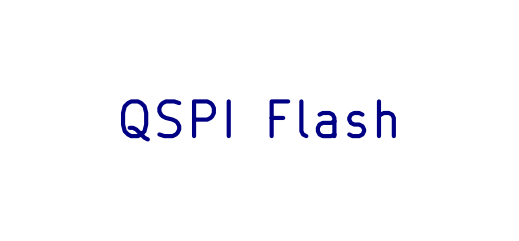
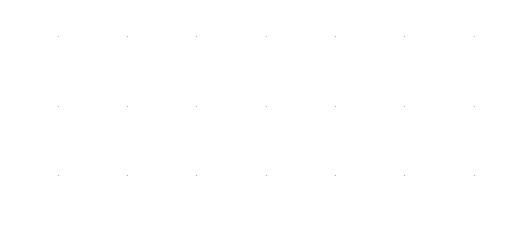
text: QSPI Flash (258, 120) -> none

